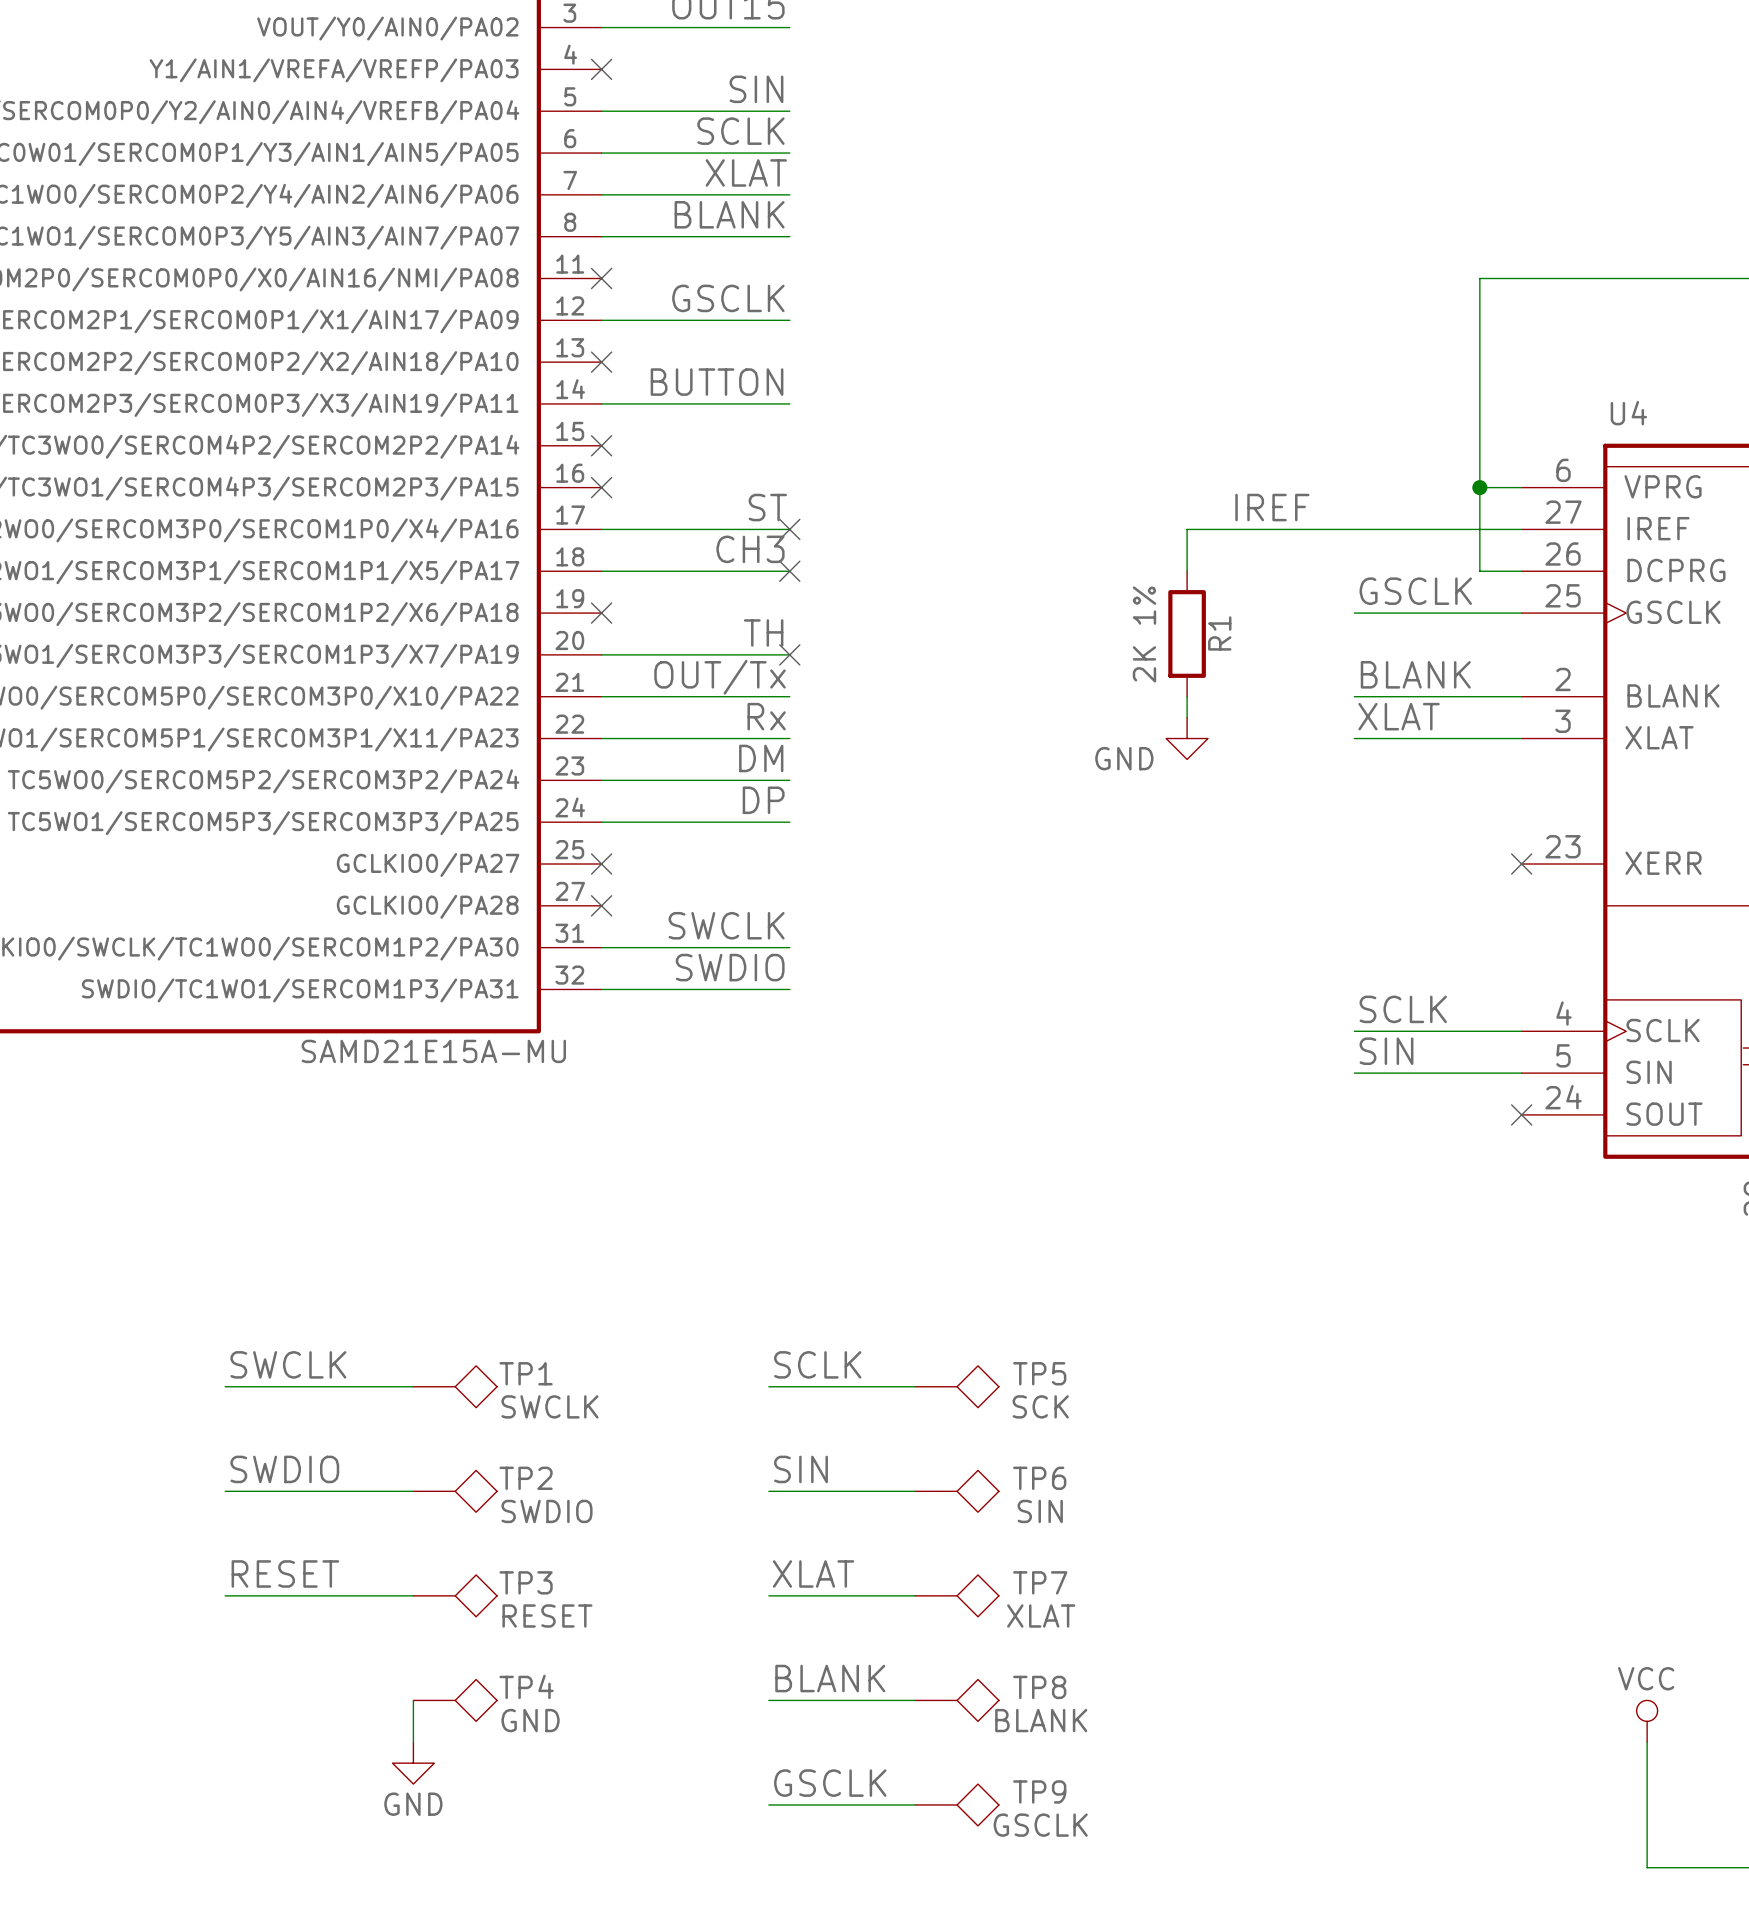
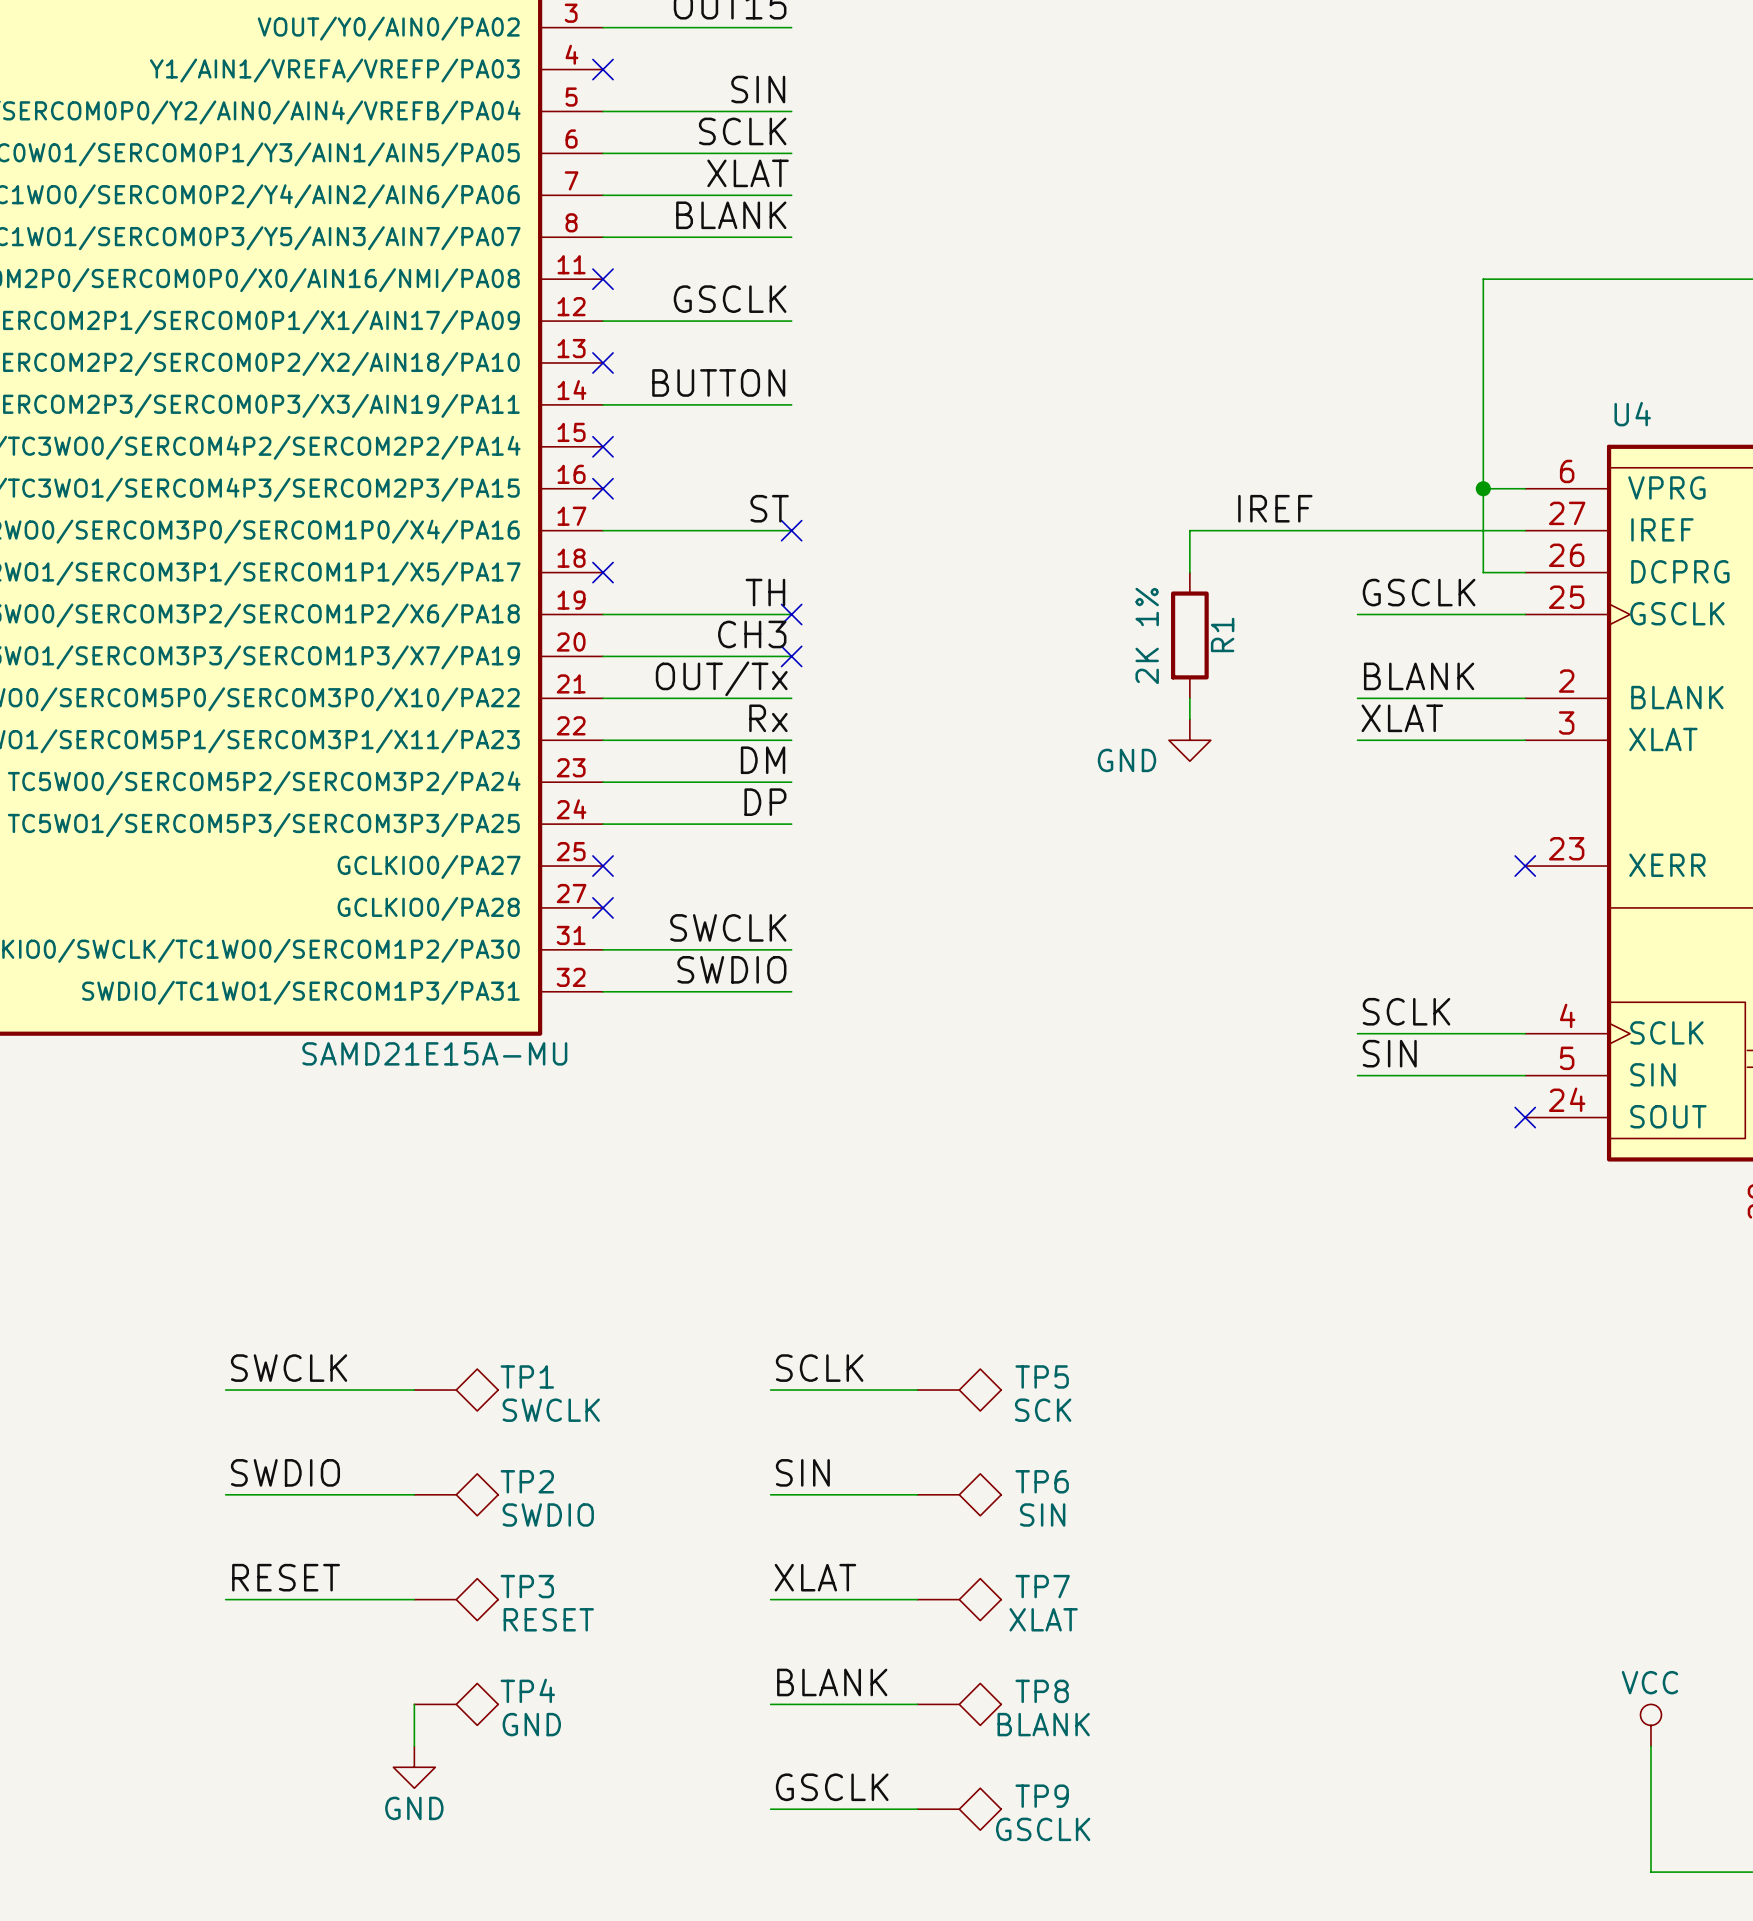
label: CH3 (750, 549) -> none
wire: (601, 571) (789, 571) -> (603, 614) (791, 614)
no-connect mark position: (789, 571) -> (791, 614)
label: none -> TH (765, 592)
no-connect mark position: (601, 613) -> (603, 572)
label: TH (763, 633) -> CH3 (752, 634)

